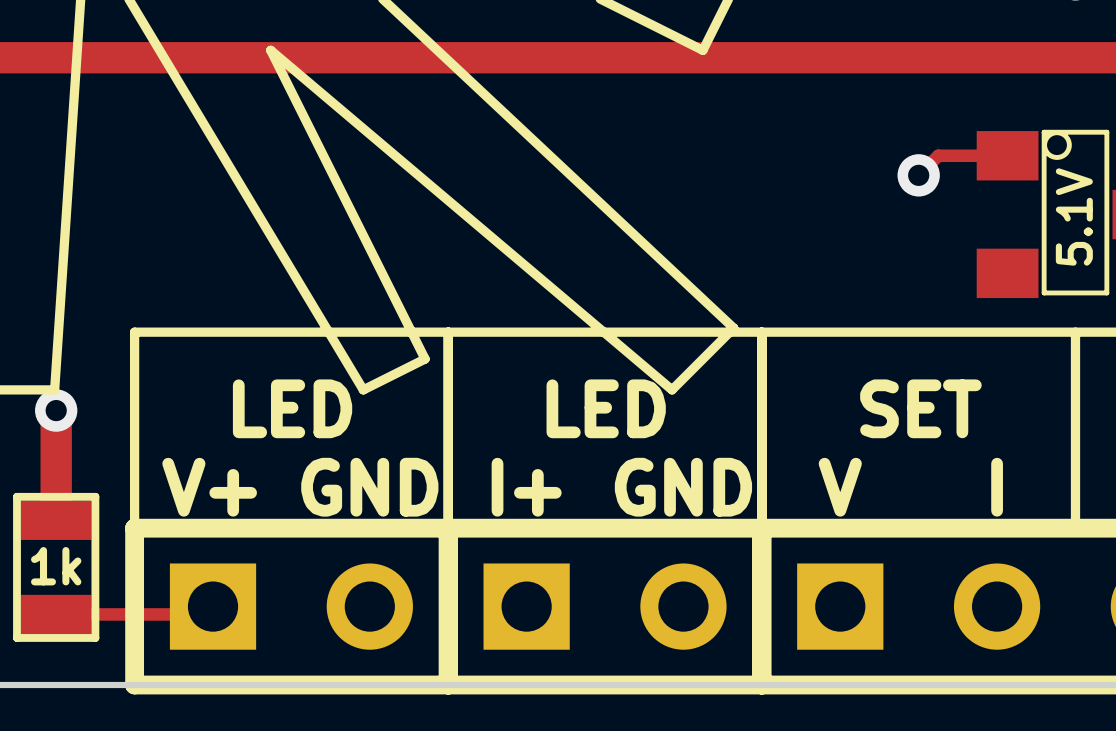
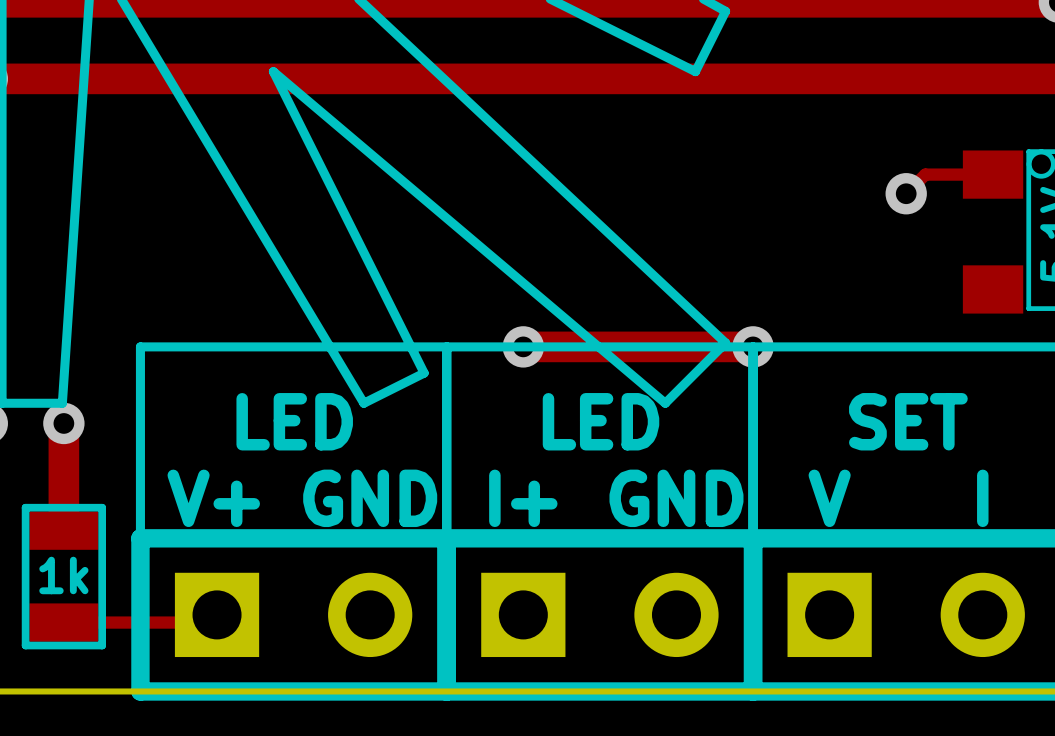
track: none -> (523, 346) (753, 346)
via: none -> (523, 346)
via: none -> (753, 346)

